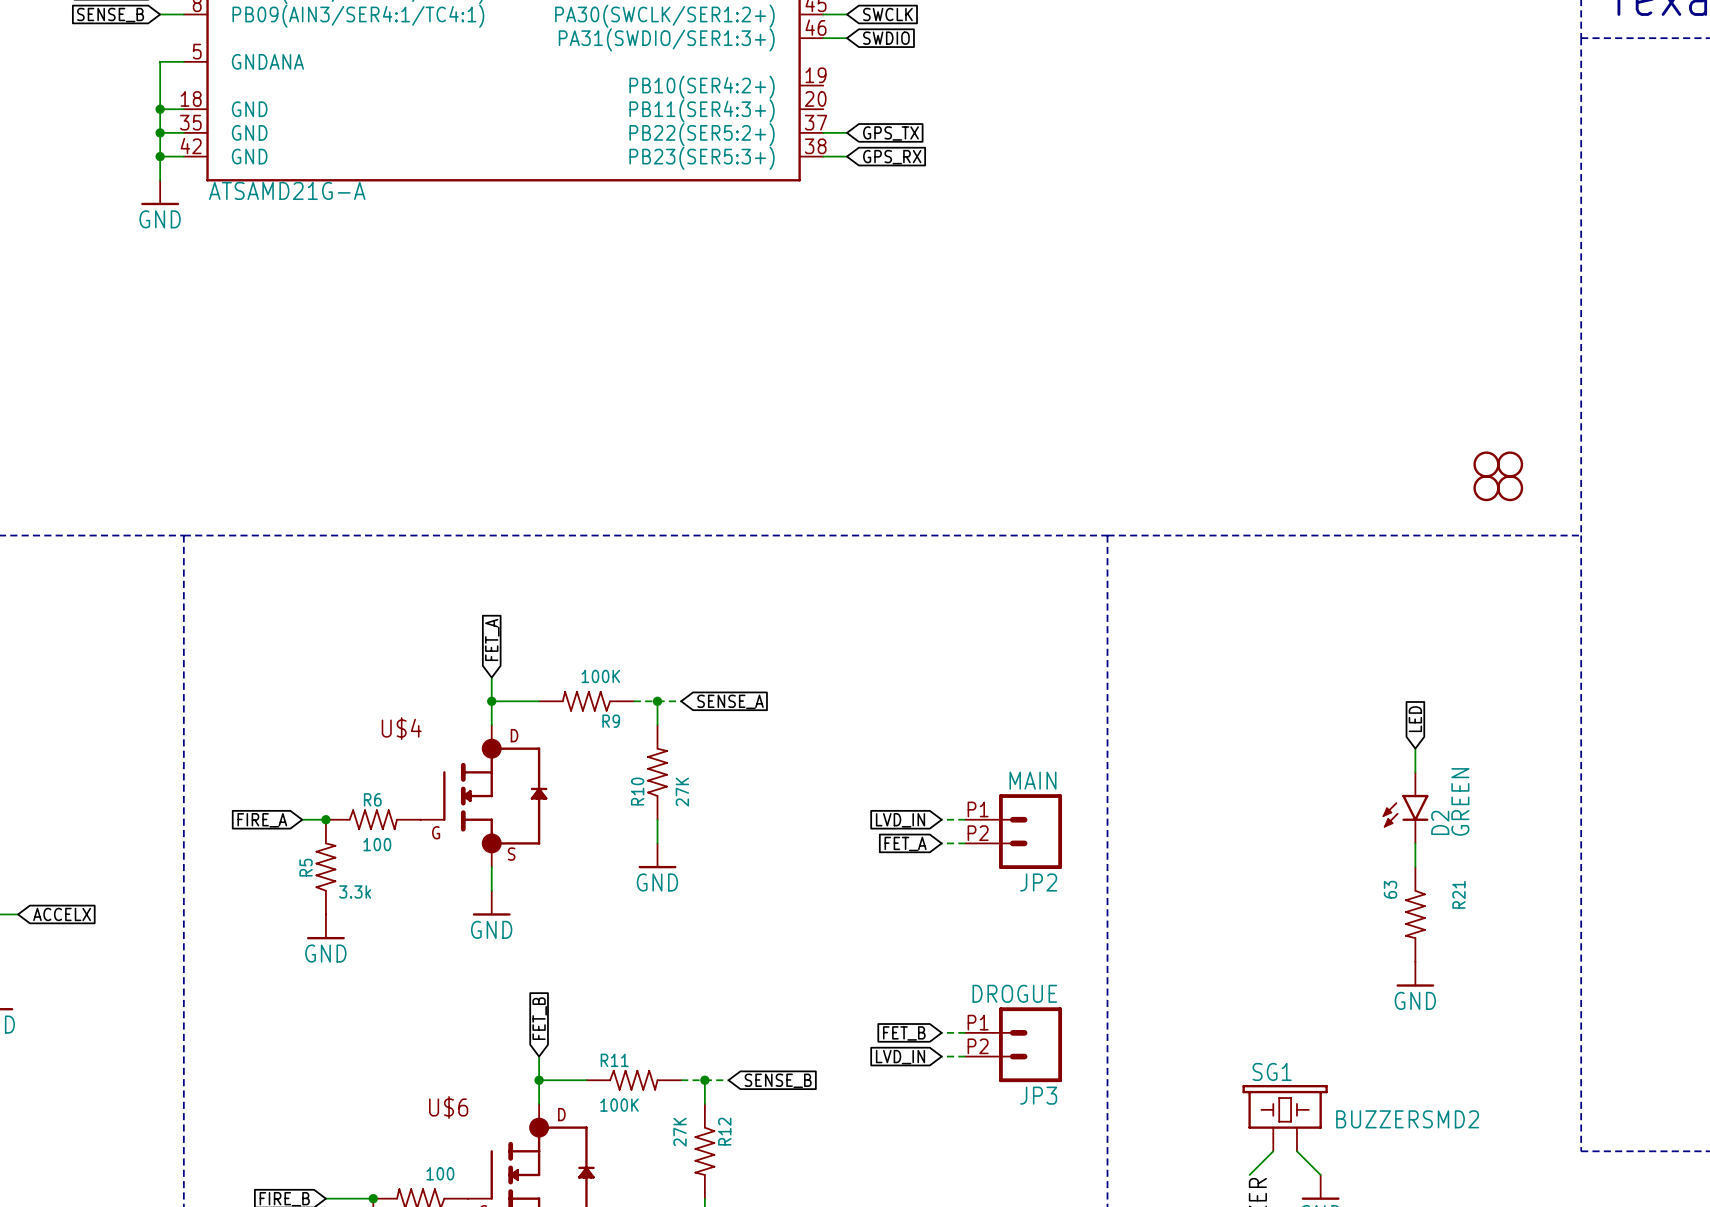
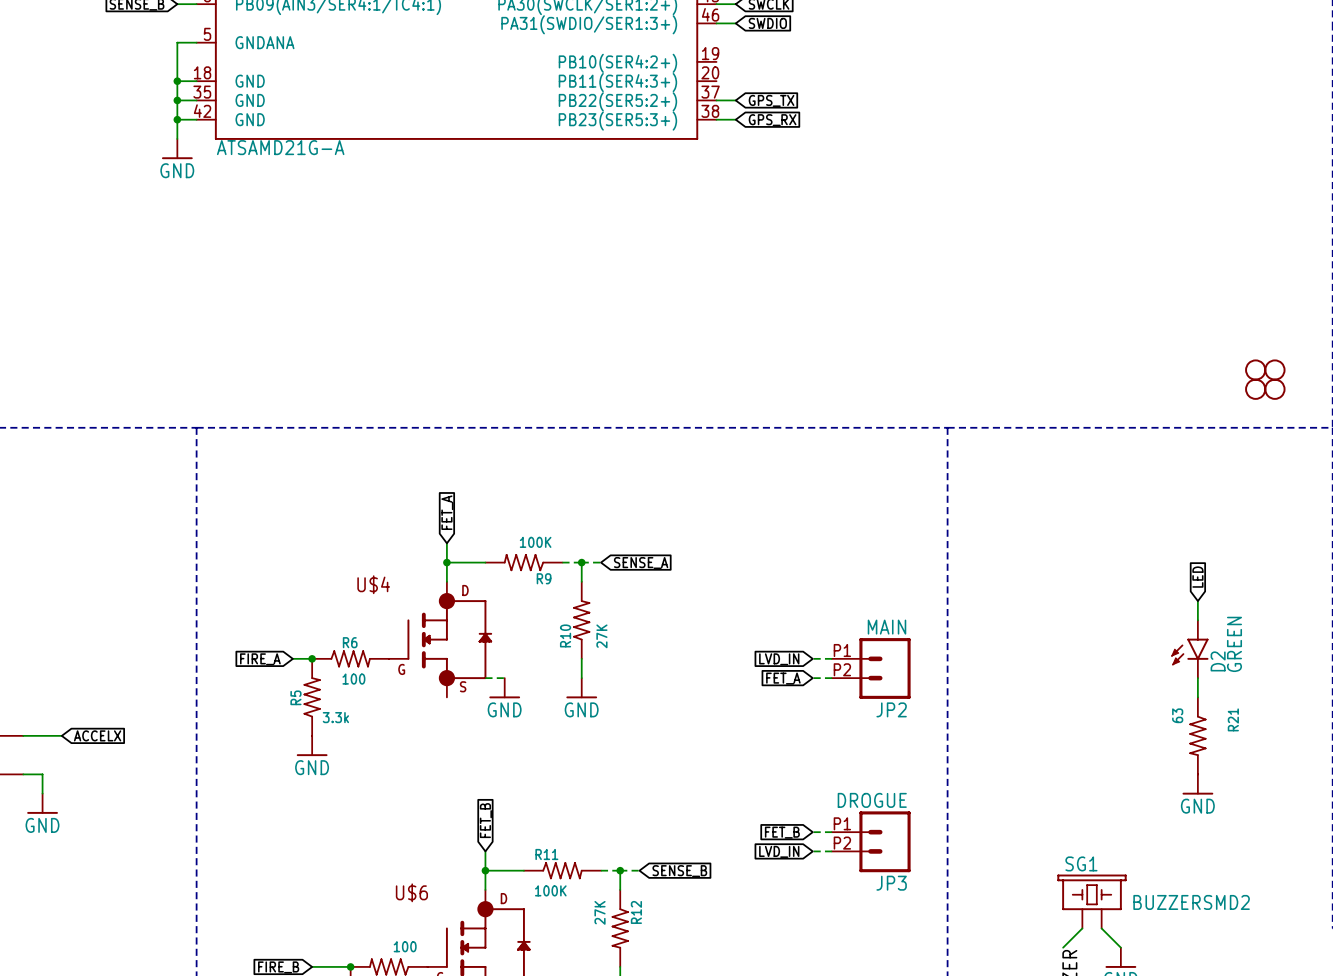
wire: none -> (485, 678) (504, 678)
wire: (491, 867) (491, 890) -> none
power symbol position: GND (491, 903) -> GND (504, 688)

